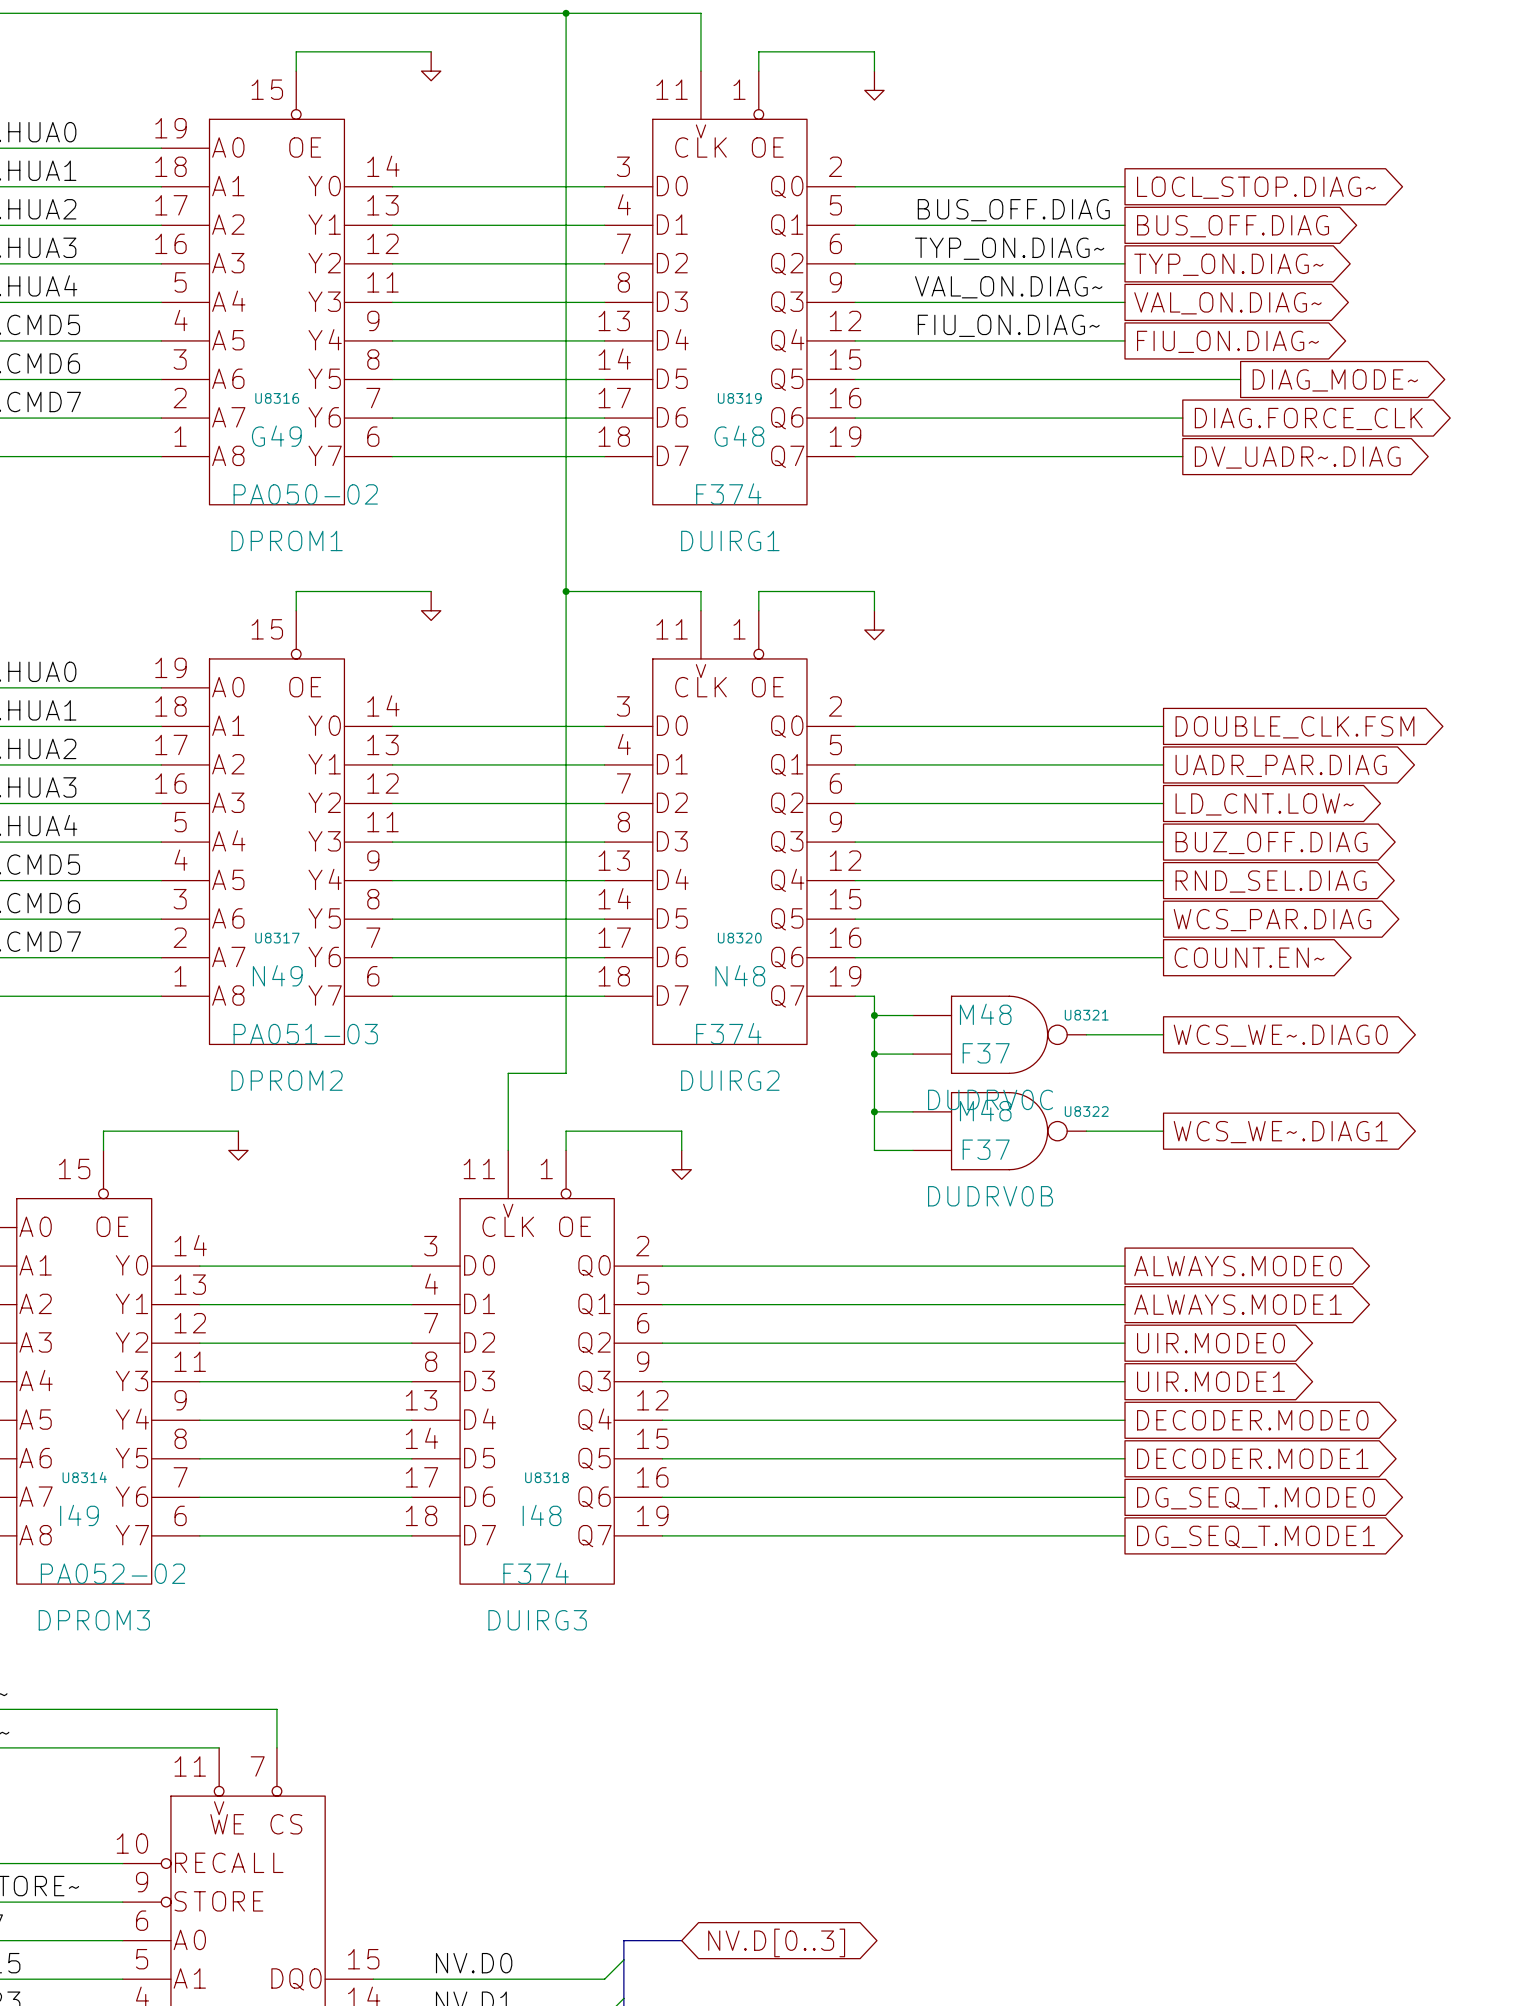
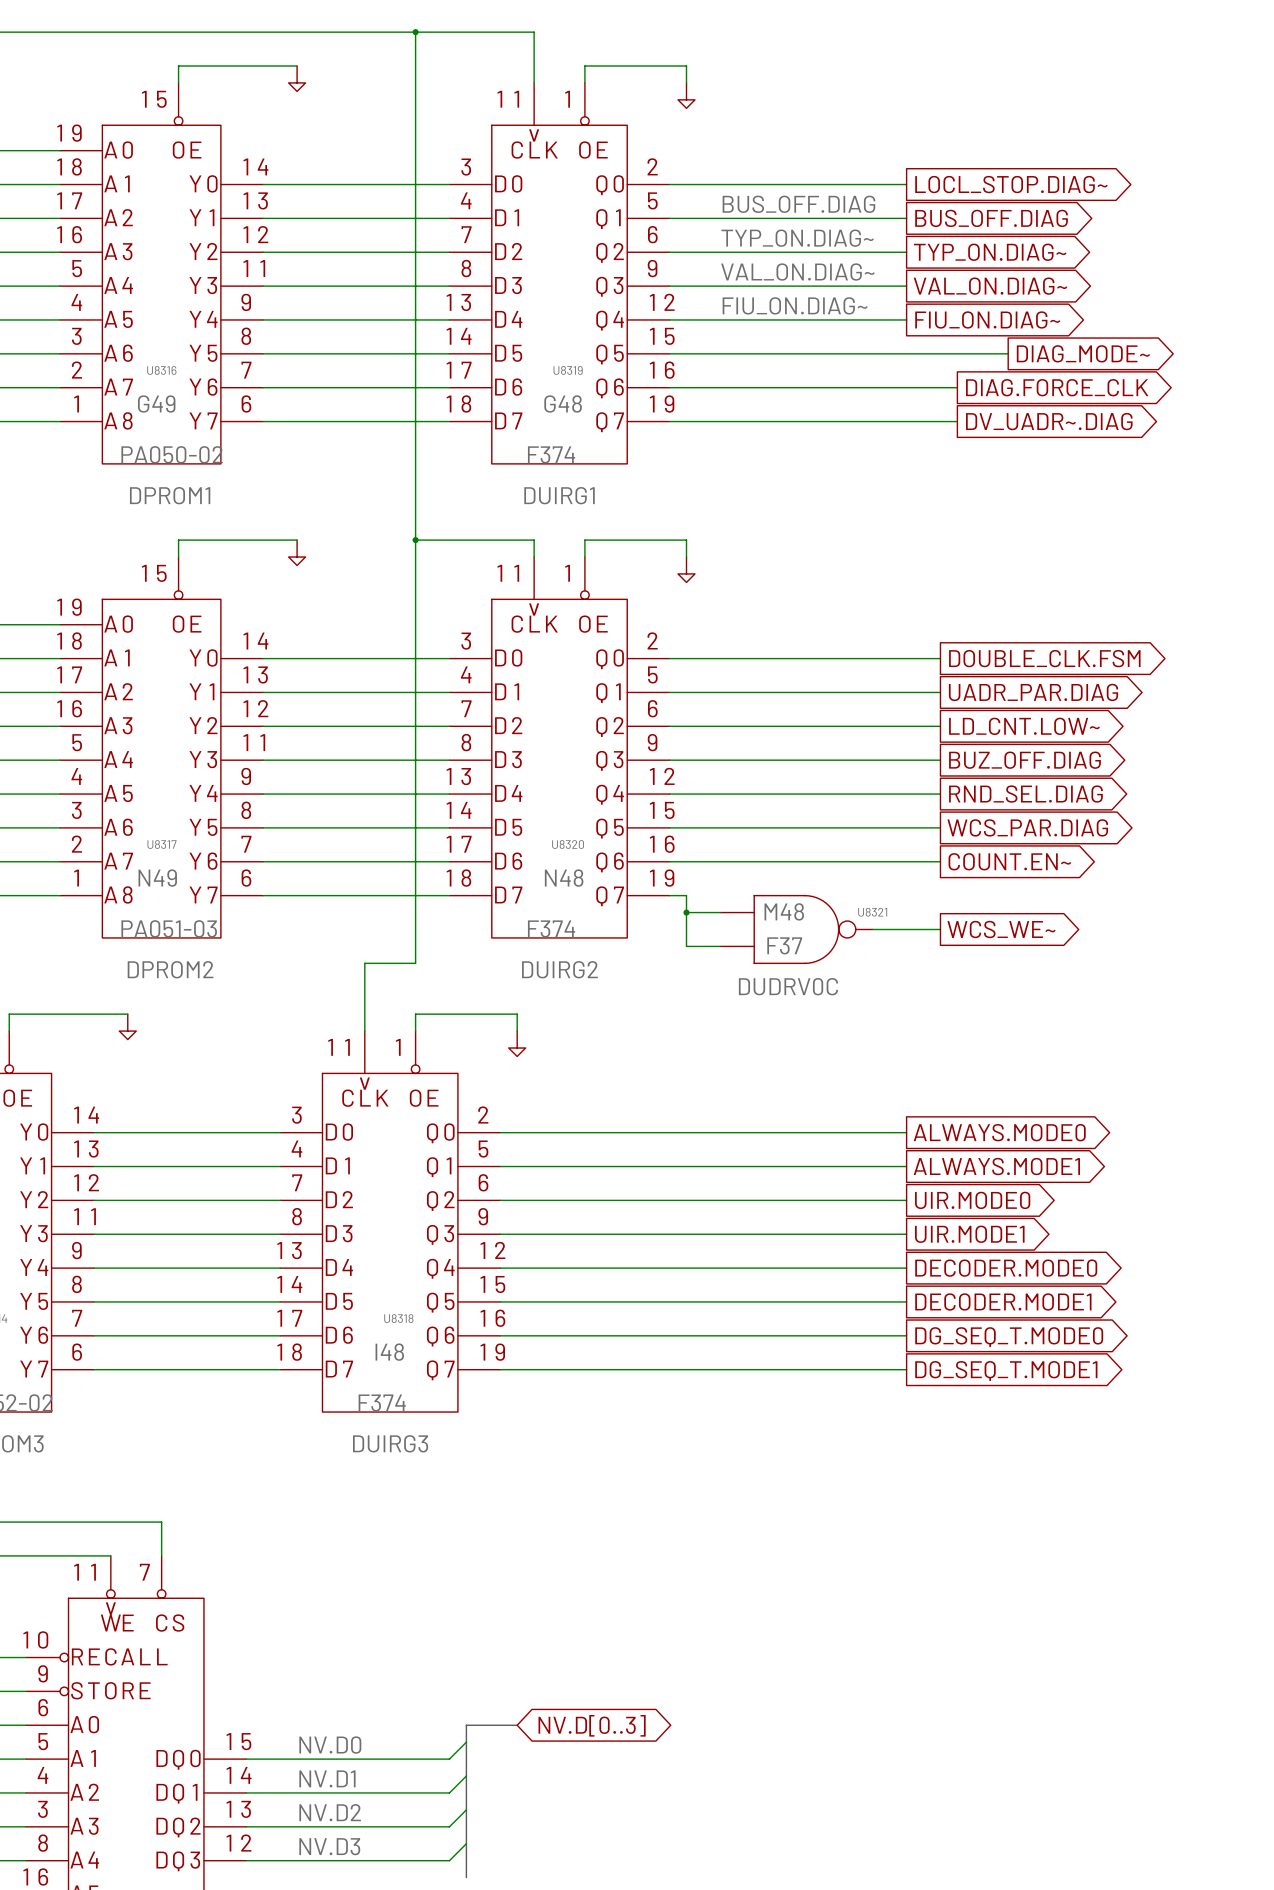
global label: WCS_WE~.DIAG0 (1280, 1035) -> WCS_WE~ (1001, 929)
wire: (874, 1054) (874, 1150) (912, 1150) -> none
junction: (874, 1054) -> none
wire: (874, 1111) (912, 1111) -> none
junction: (874, 1111) -> none
U8322: F37 (999, 1131) -> none
wire: (1086, 1131) (1163, 1131) -> none
global label: WCS_WE~.DIAG1 (1280, 1132) -> none

